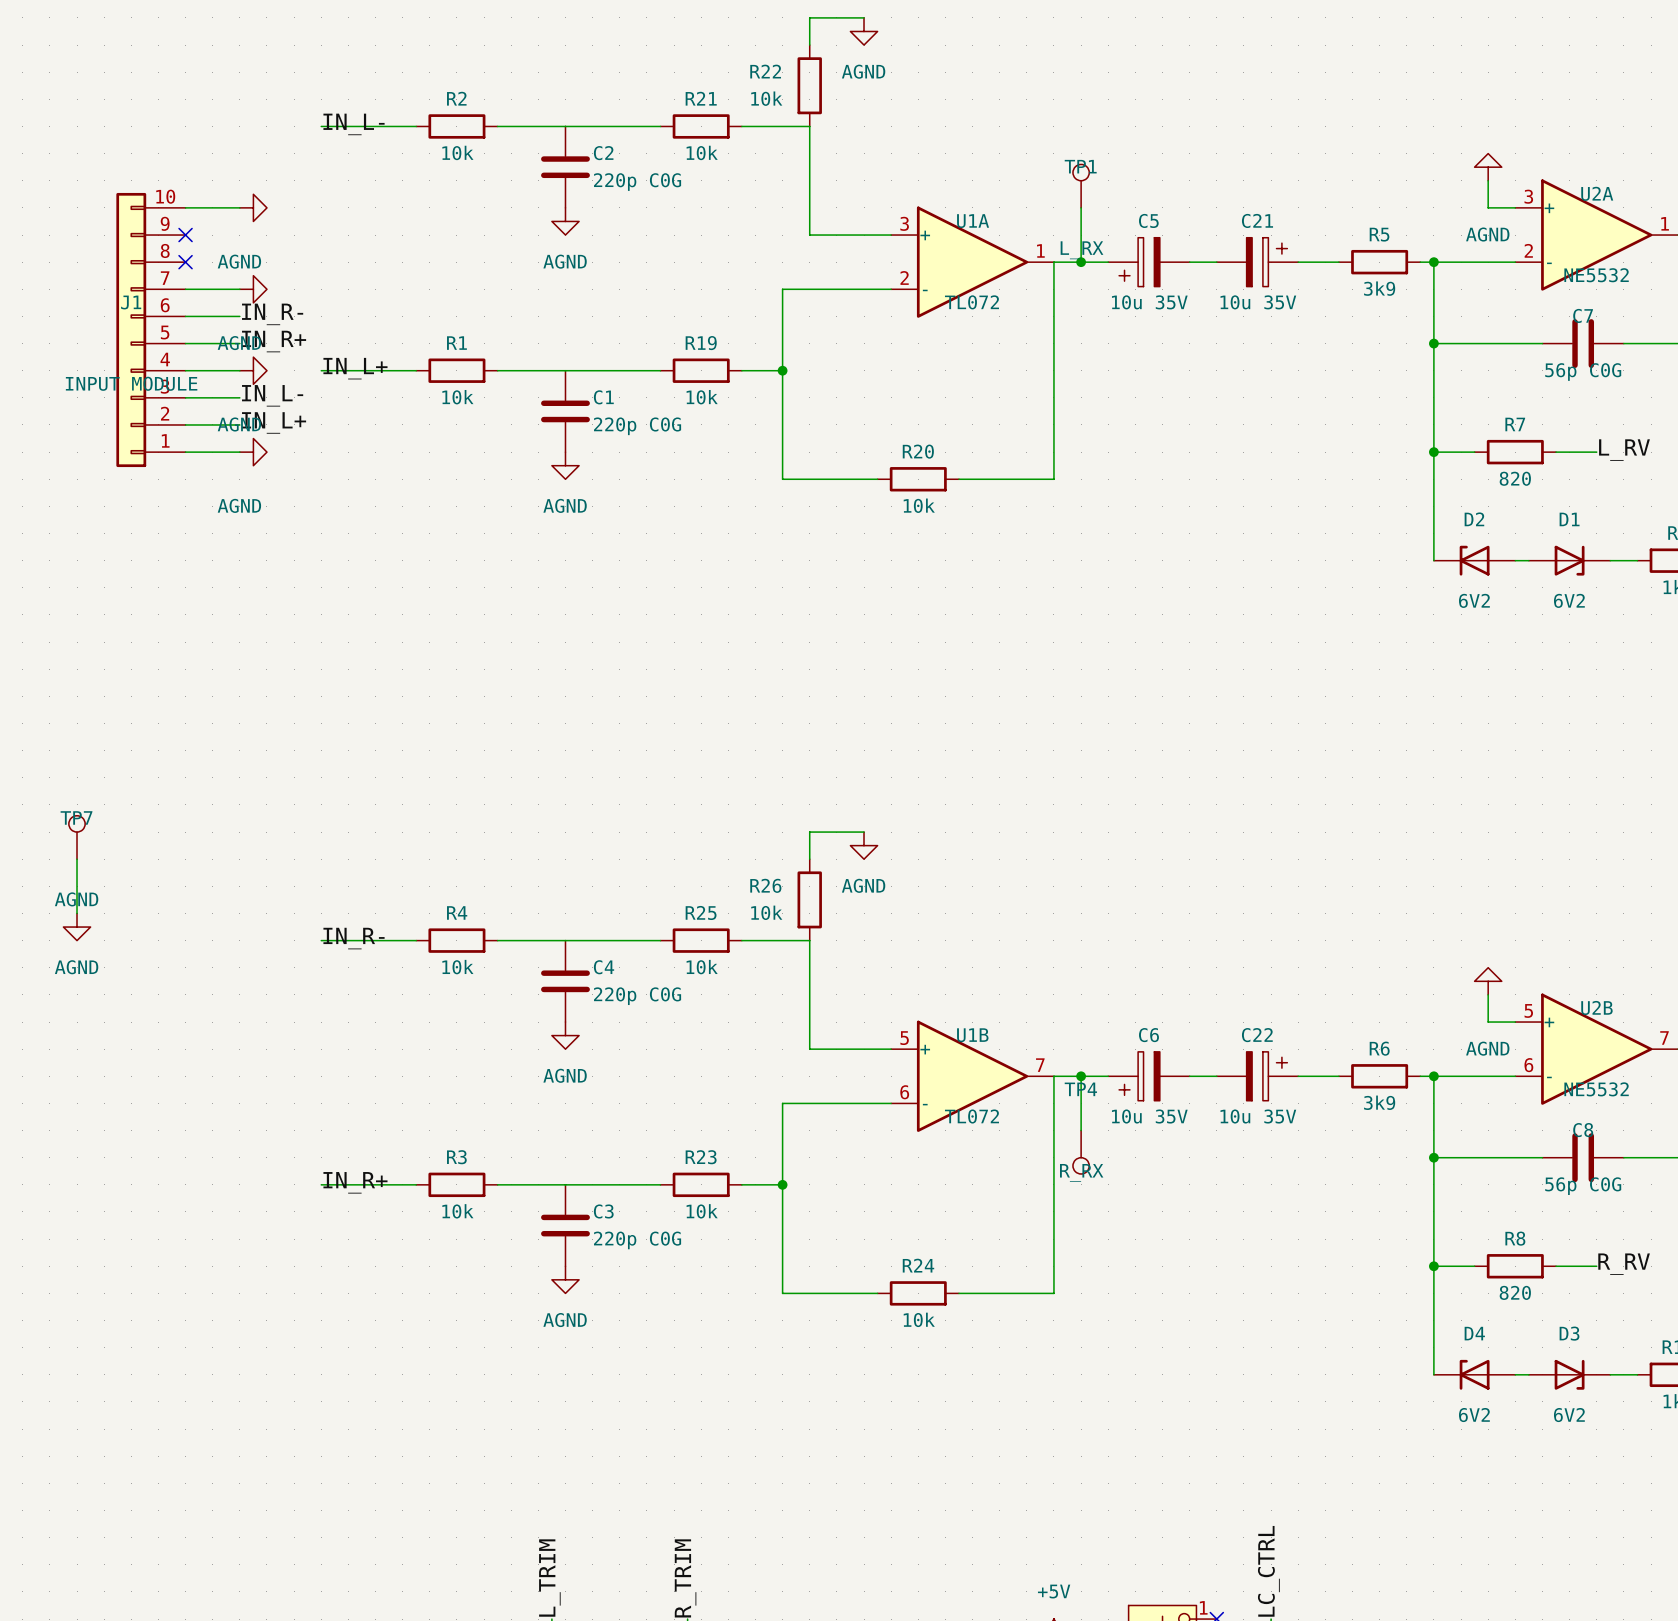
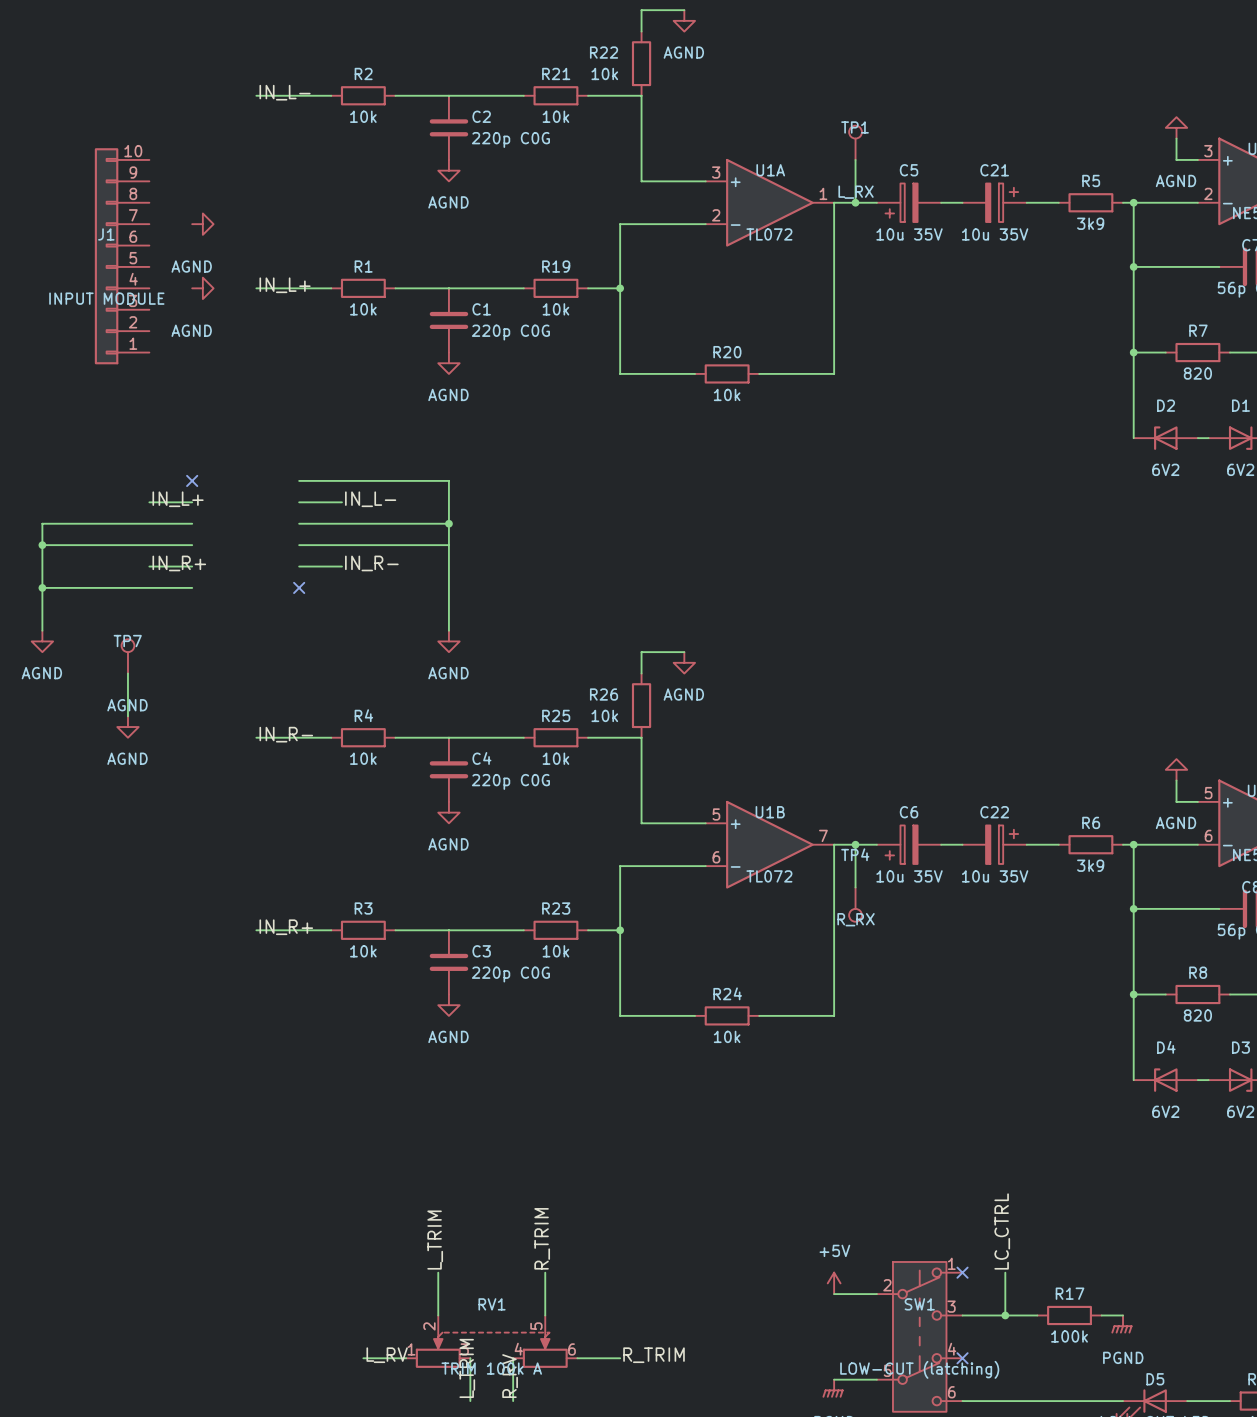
wire: (185, 207) (239, 207) -> none
power symbol: AGND (253, 207) -> none
no-connect mark: (185, 235) -> none
no-connect mark: (185, 262) -> none
wire: (185, 289) (239, 289) -> none
label: IN_R- (272, 314) -> none
wire: (185, 316) (239, 316) -> none
label: IN_R+ (274, 341) -> none
wire: (185, 343) (239, 343) -> none
wire: (185, 370) (239, 370) -> none
label: IN_L- (272, 395) -> none
wire: (185, 397) (239, 397) -> none
label position: IN_L+ (274, 422) -> IN_L+ (178, 499)
wire: (185, 424) (239, 424) -> none
wire: (185, 452) (239, 452) -> (149, 502) (192, 502)
power symbol: AGND (253, 452) -> none
no-connect mark: none -> (192, 480)
wire: none -> (299, 480) (448, 480) (448, 630)
label: none -> IN_L- (370, 499)
wire: none -> (299, 502) (341, 502)
wire: none -> (192, 523) (42, 523) (42, 630)
wire: none -> (299, 523) (448, 523)
junction: none -> (448, 523)
wire: none -> (42, 545) (192, 545)
junction: none -> (42, 545)
wire: none -> (299, 545) (448, 545)
label: none -> IN_R+ (179, 563)
label: none -> IN_R- (371, 563)
wire: none -> (149, 566) (192, 566)
wire: none -> (299, 566) (341, 566)
wire: none -> (42, 587) (192, 587)
junction: none -> (42, 587)
no-connect mark: none -> (299, 587)
power symbol: none -> AGND (42, 641)
power symbol: none -> AGND (448, 641)
TP7 position: (77, 837) -> (127, 656)
wire: (77, 859) (77, 913) -> (127, 673) (127, 716)
power symbol: AGND (77, 927) -> none
power symbol: none -> AGND (127, 727)

